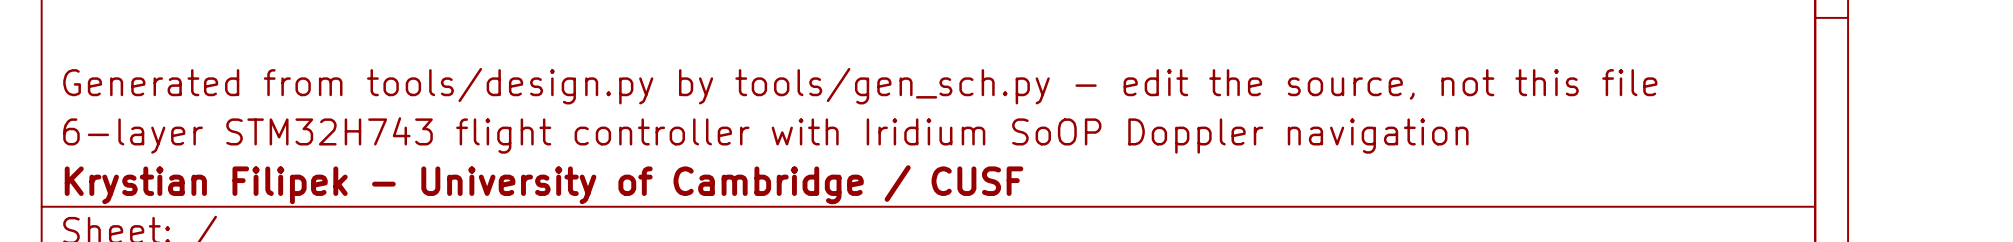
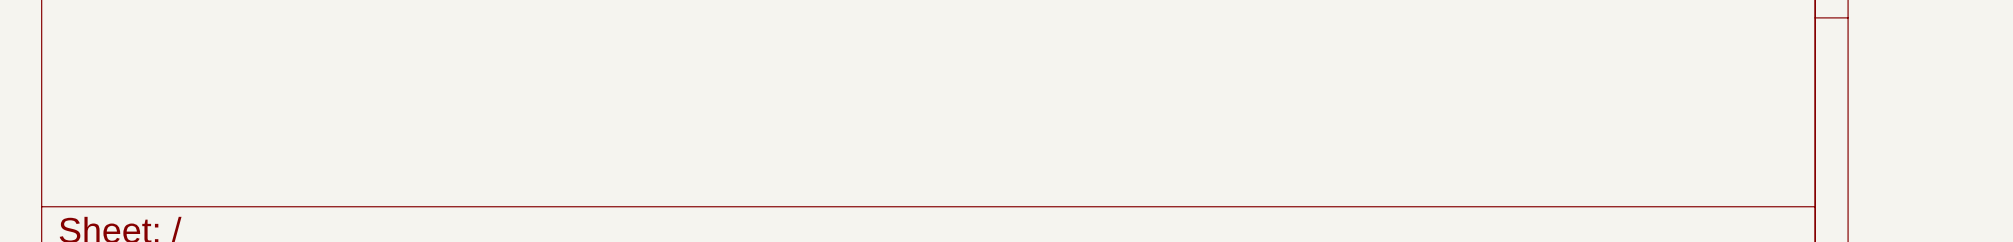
title block: Generated from tools/design.py by tools/gen_sch.py - edit the source, not this file (860, 86) -> none
title block: 6-layer STM32H743 flight controller with Iridium SoOP Doppler navigation (765, 135) -> none
title block: Krystian Filipek - University of Cambridge / CUSF (544, 184) -> none

